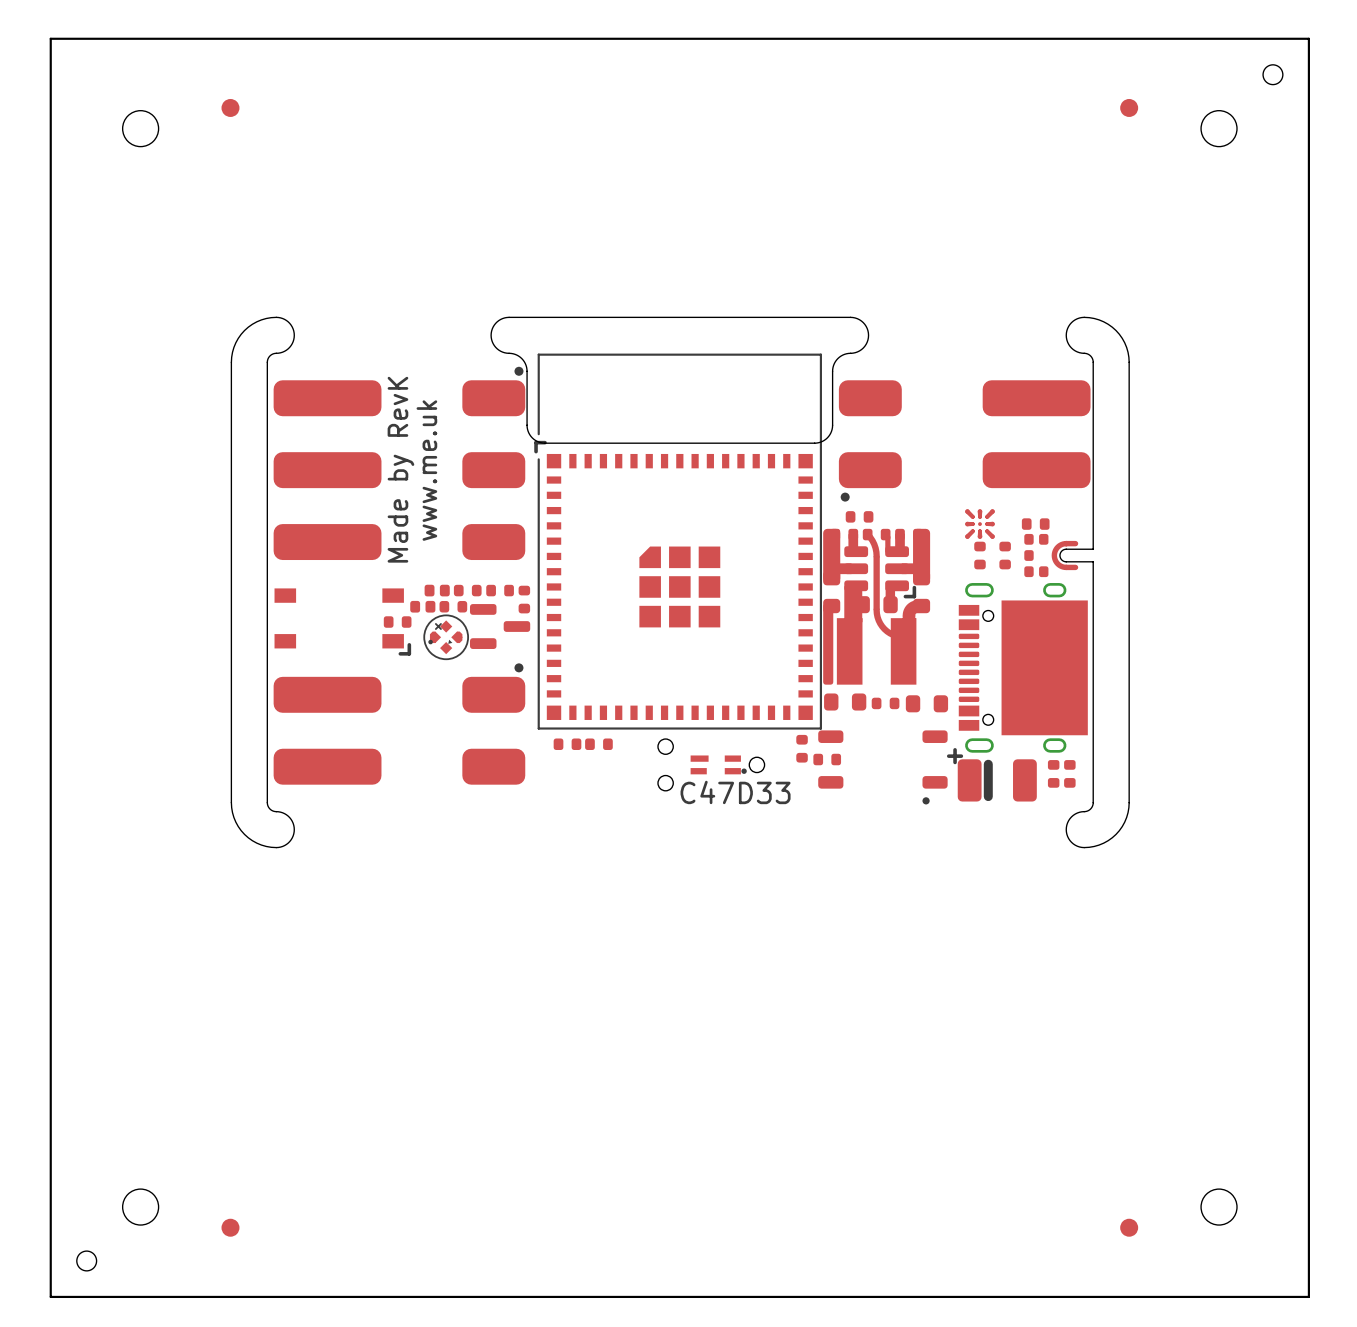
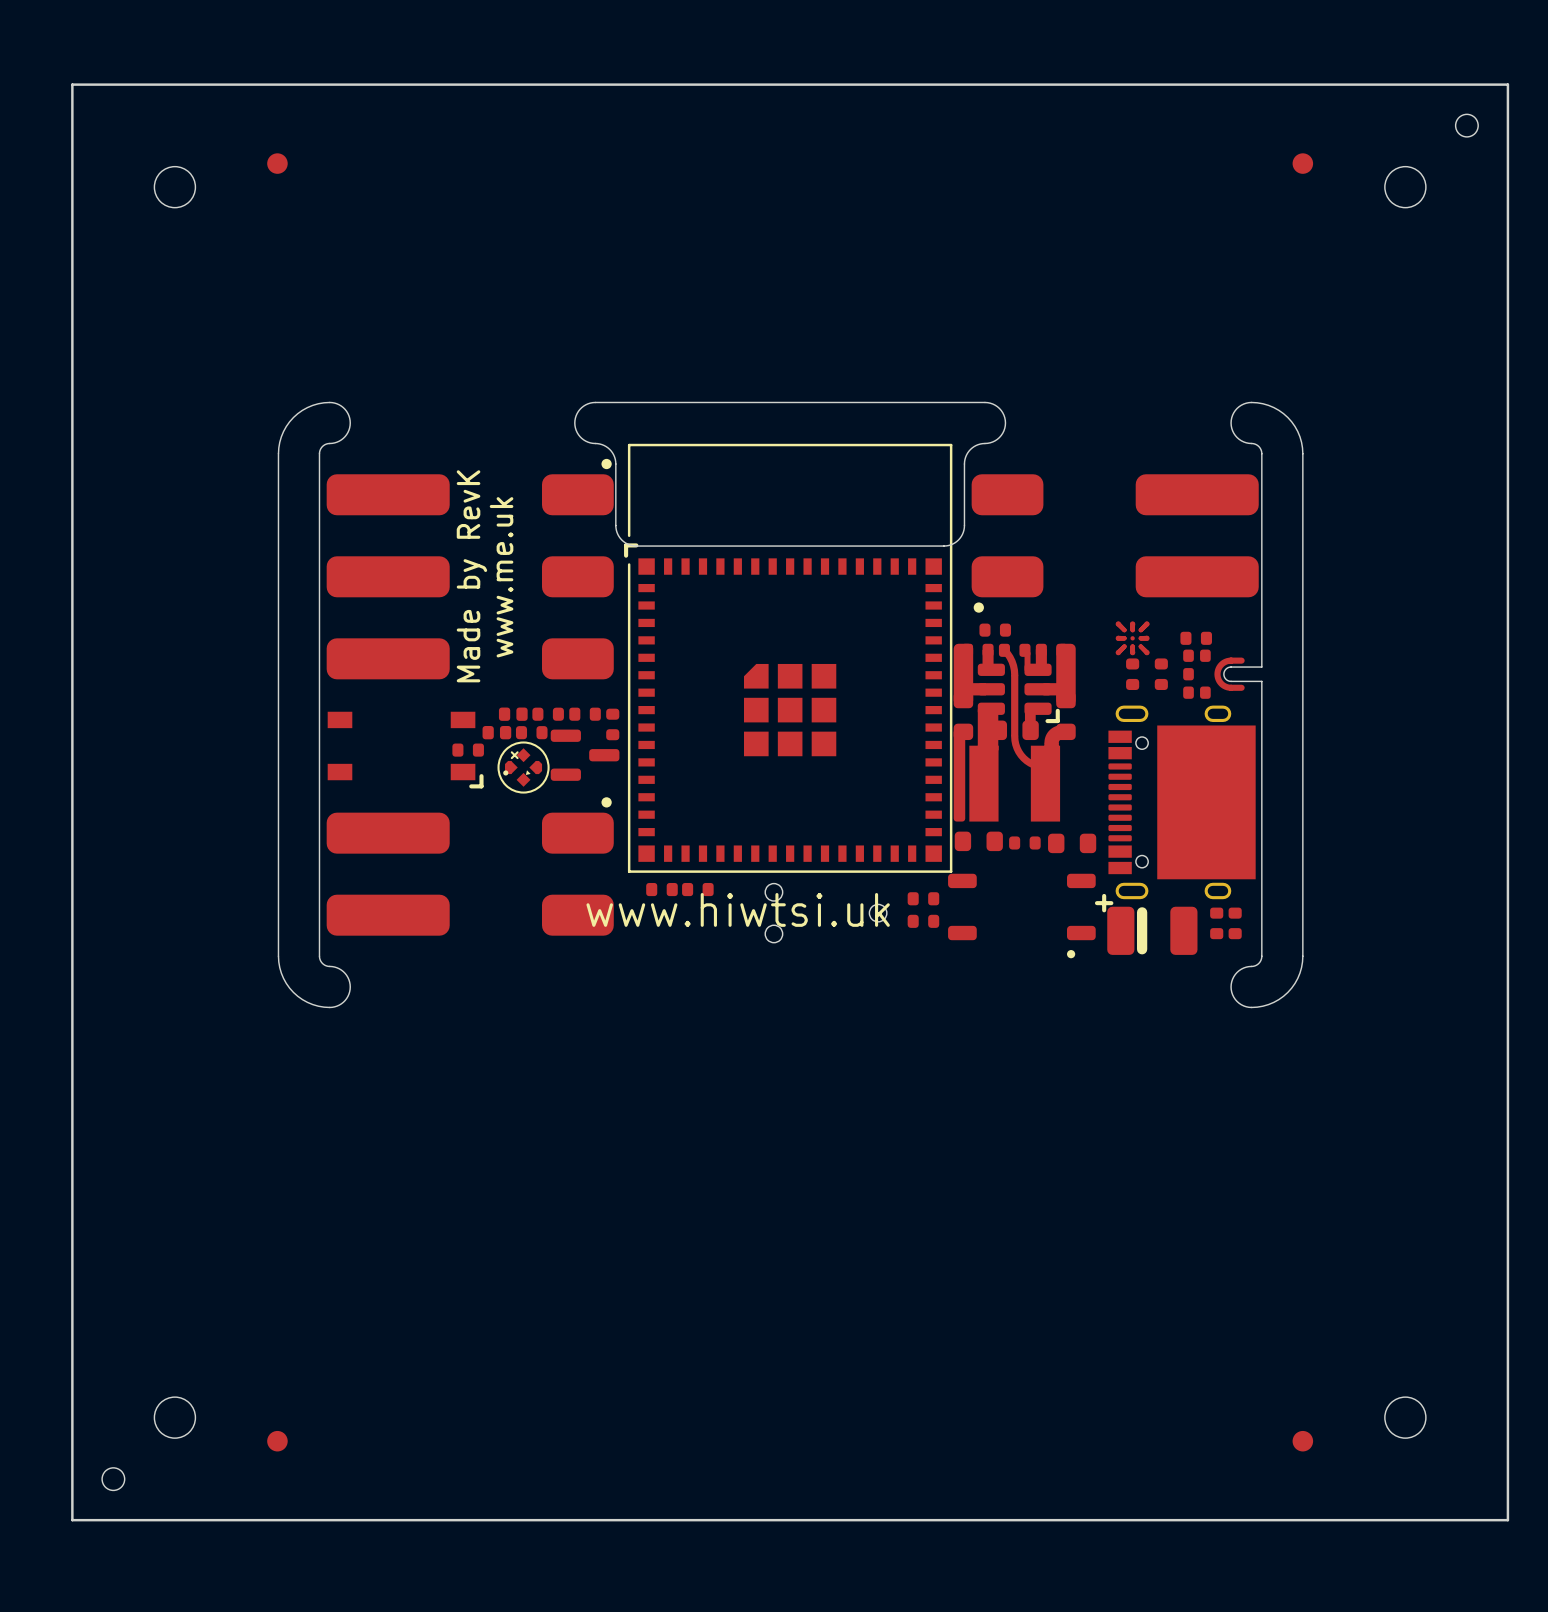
part footprint: [796, 734, 808, 763] -> [907, 892, 940, 906]
part: (827, 759) -> none
text: none -> www.hiwtsi.uk (738, 909)
part: (718, 764) -> none
part: none -> (923, 921)
text: C47D33 (735, 792) -> none

